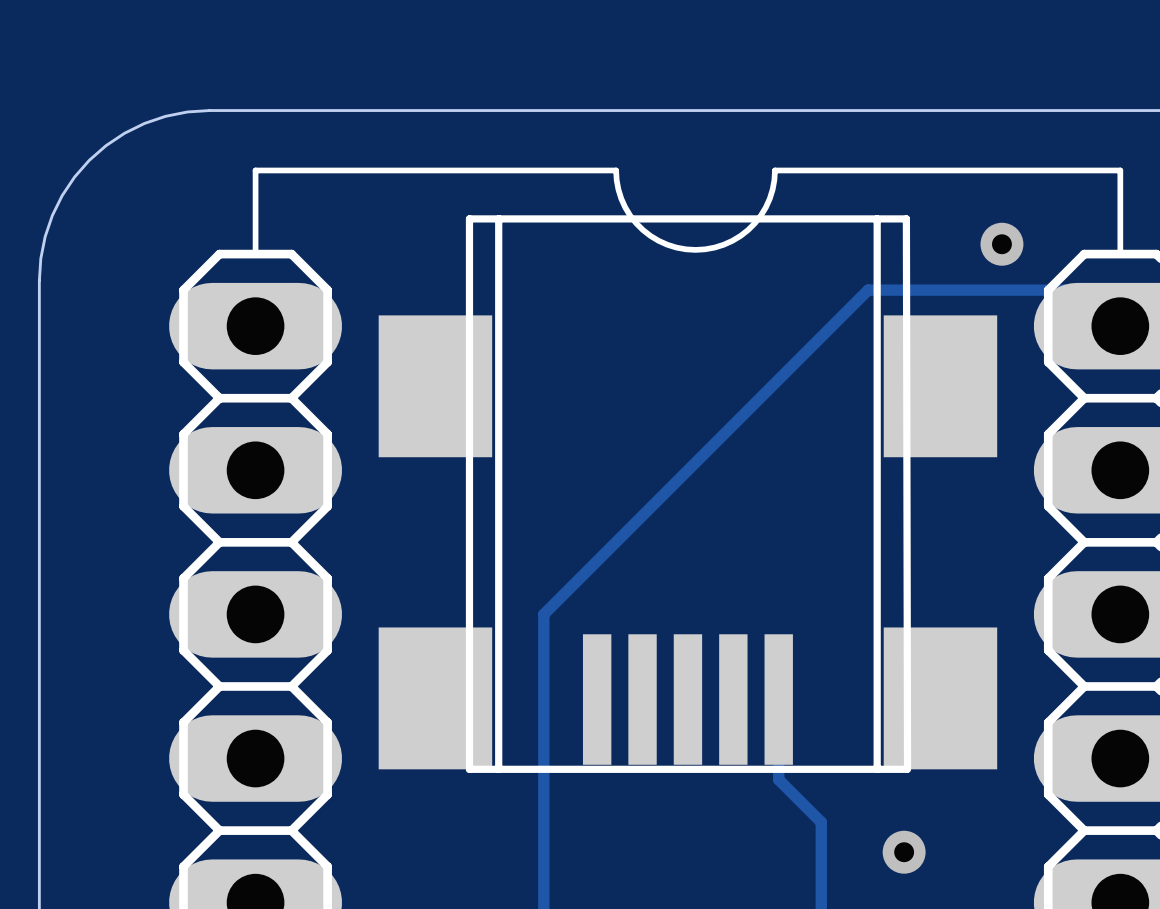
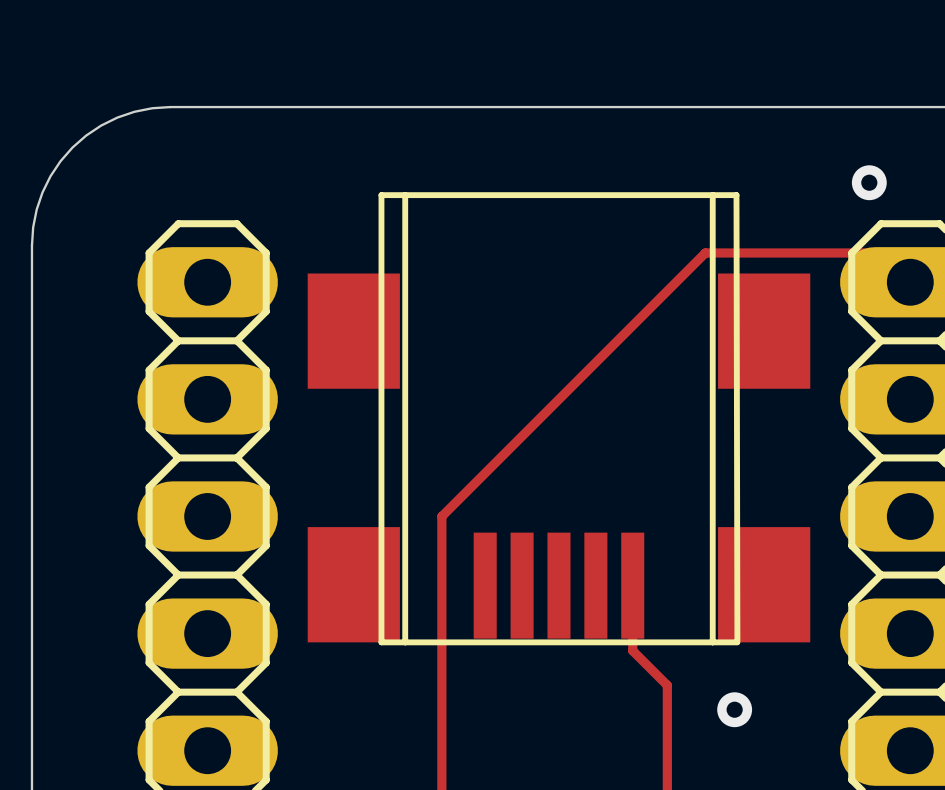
via position: (1001, 244) -> (869, 182)
line: (255, 254) (255, 170) (616, 170) (618, 189) (625, 207) (642, 229) (667, 244) (695, 249) (723, 244) (748, 229) (760, 215) (769, 198) (774, 170) (1120, 170) (1120, 254) -> none

